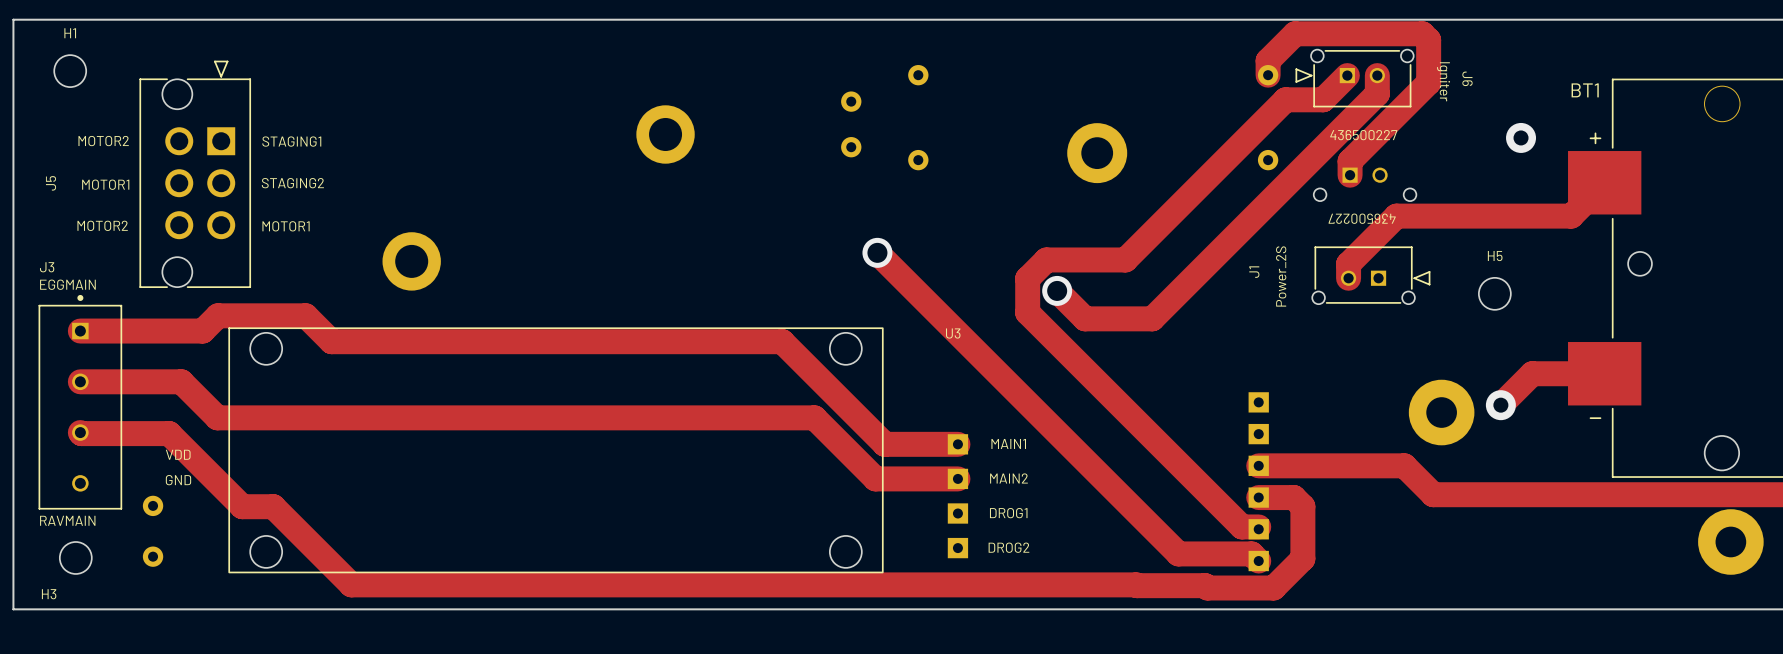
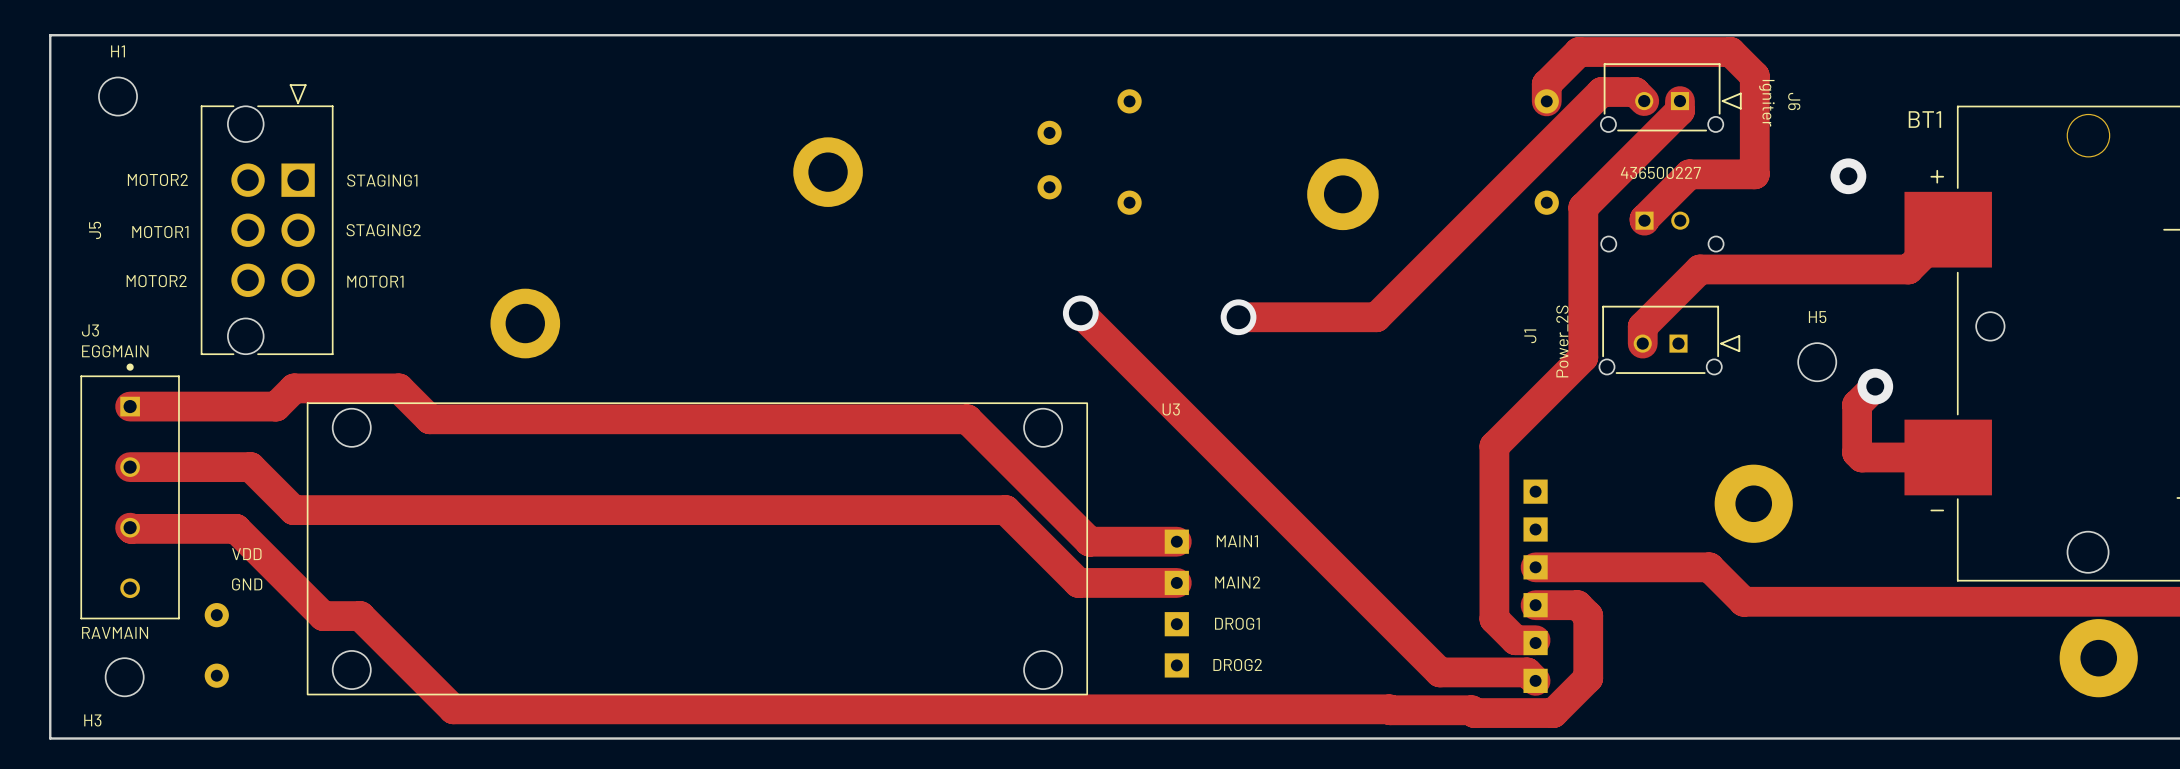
track: (1428, 40) (1428, 82) (1350, 161) (1350, 173) -> (1738, 59) (1754, 76) (1754, 174) (1689, 174) (1644, 219)
J6 footprint: [1295, 49, 1414, 108] -> [1600, 63, 1742, 133]
track: none -> (1644, 101) (1635, 92) (1601, 92) (1376, 317) (1238, 317)
track: (1347, 75) (1323, 99) (1285, 99) (1125, 259) (1046, 259) (1027, 278) (1027, 312) (1224, 509) -> (1679, 101) (1679, 110) (1583, 207) (1583, 357) (1494, 446) (1494, 619)
track: (1377, 75) (1377, 93) (1152, 318) (1085, 318) (1057, 290) -> none
via position: (1057, 290) -> (1238, 317)
via: none -> (1875, 386)
track: (1532, 373) (1500, 405) -> (1861, 457) (1857, 452) (1857, 404) (1875, 386)
via: (1500, 405) -> none

